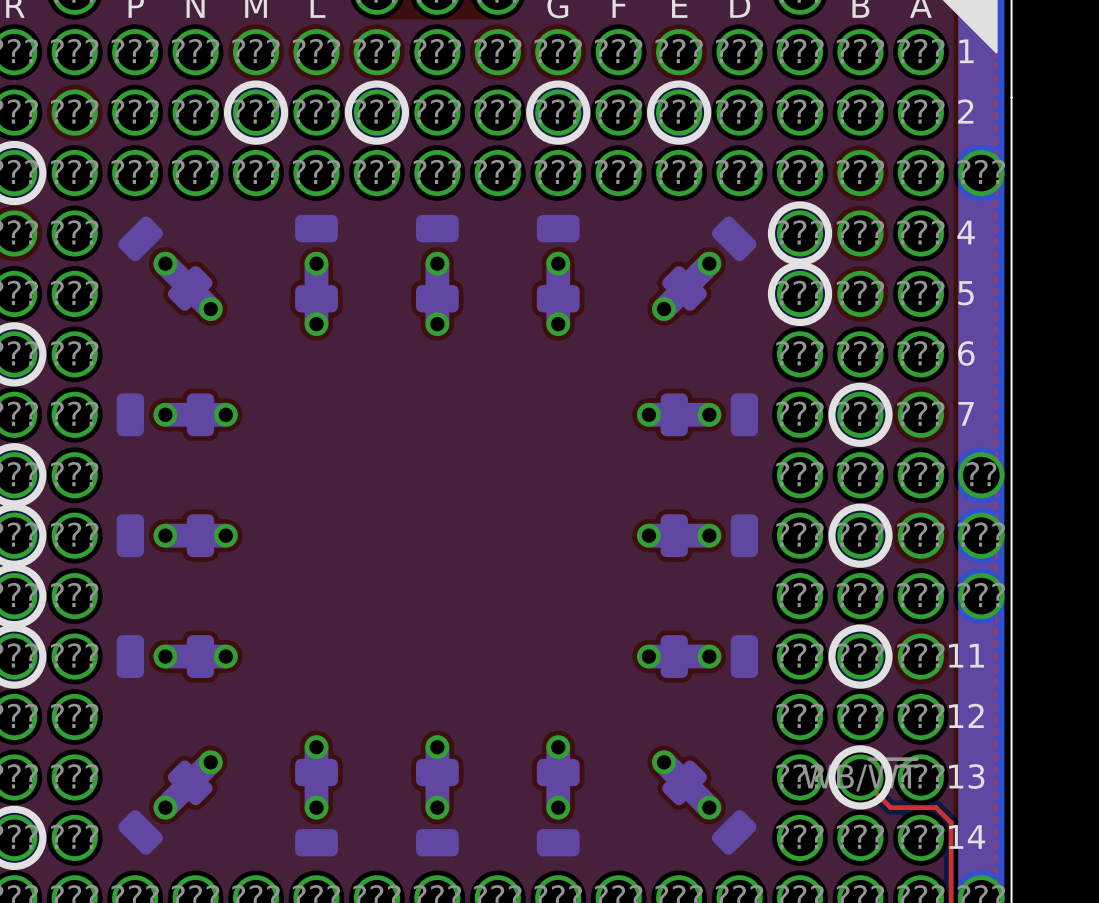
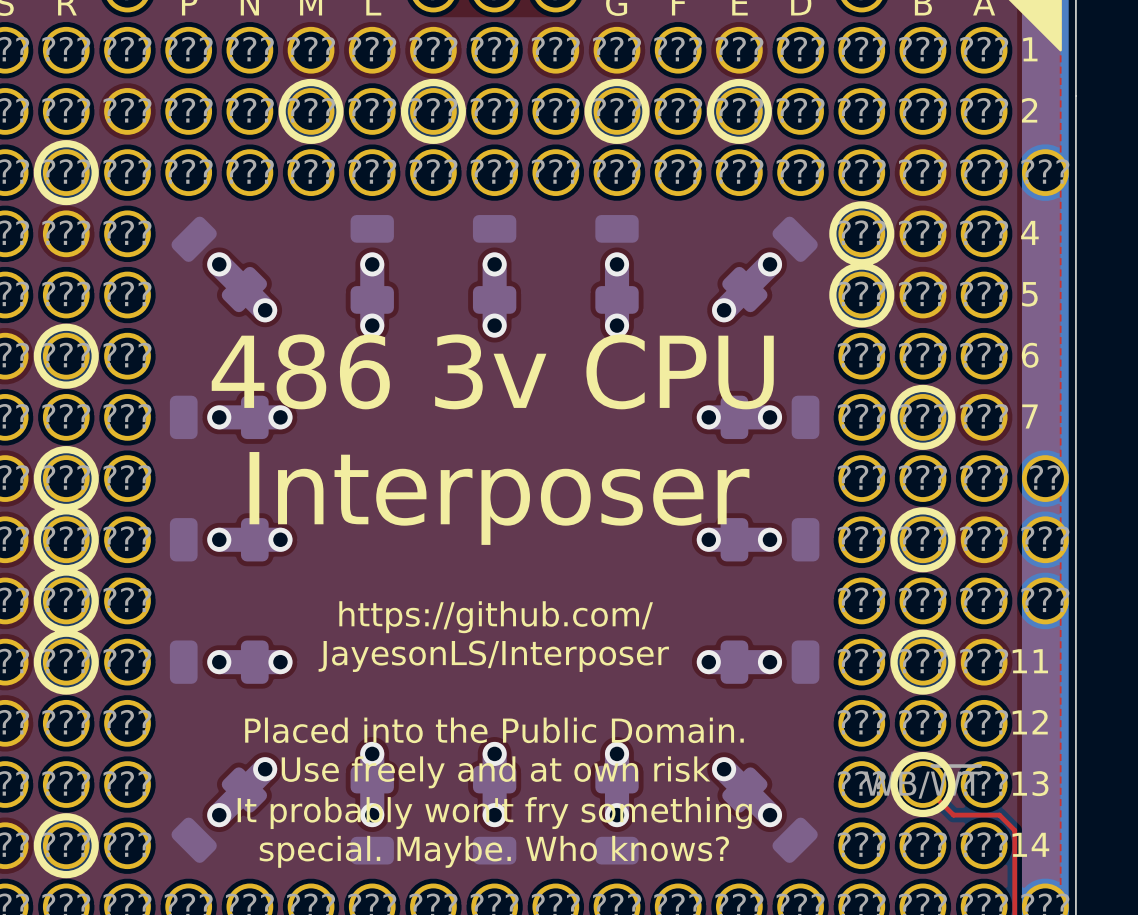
text: none -> 486 3v CPU (492, 371)
text: none -> Interposer (499, 498)
text: none -> https://github.com/ (496, 617)
text: none -> JayesonLS/Interposer (493, 656)
text: none -> Placed into the Public Domain. (494, 730)
text: none -> Use freely and at own risk (496, 772)
text: none -> It probably won't fry something (494, 813)
text: none -> special. Maybe. Who knows? (494, 851)

